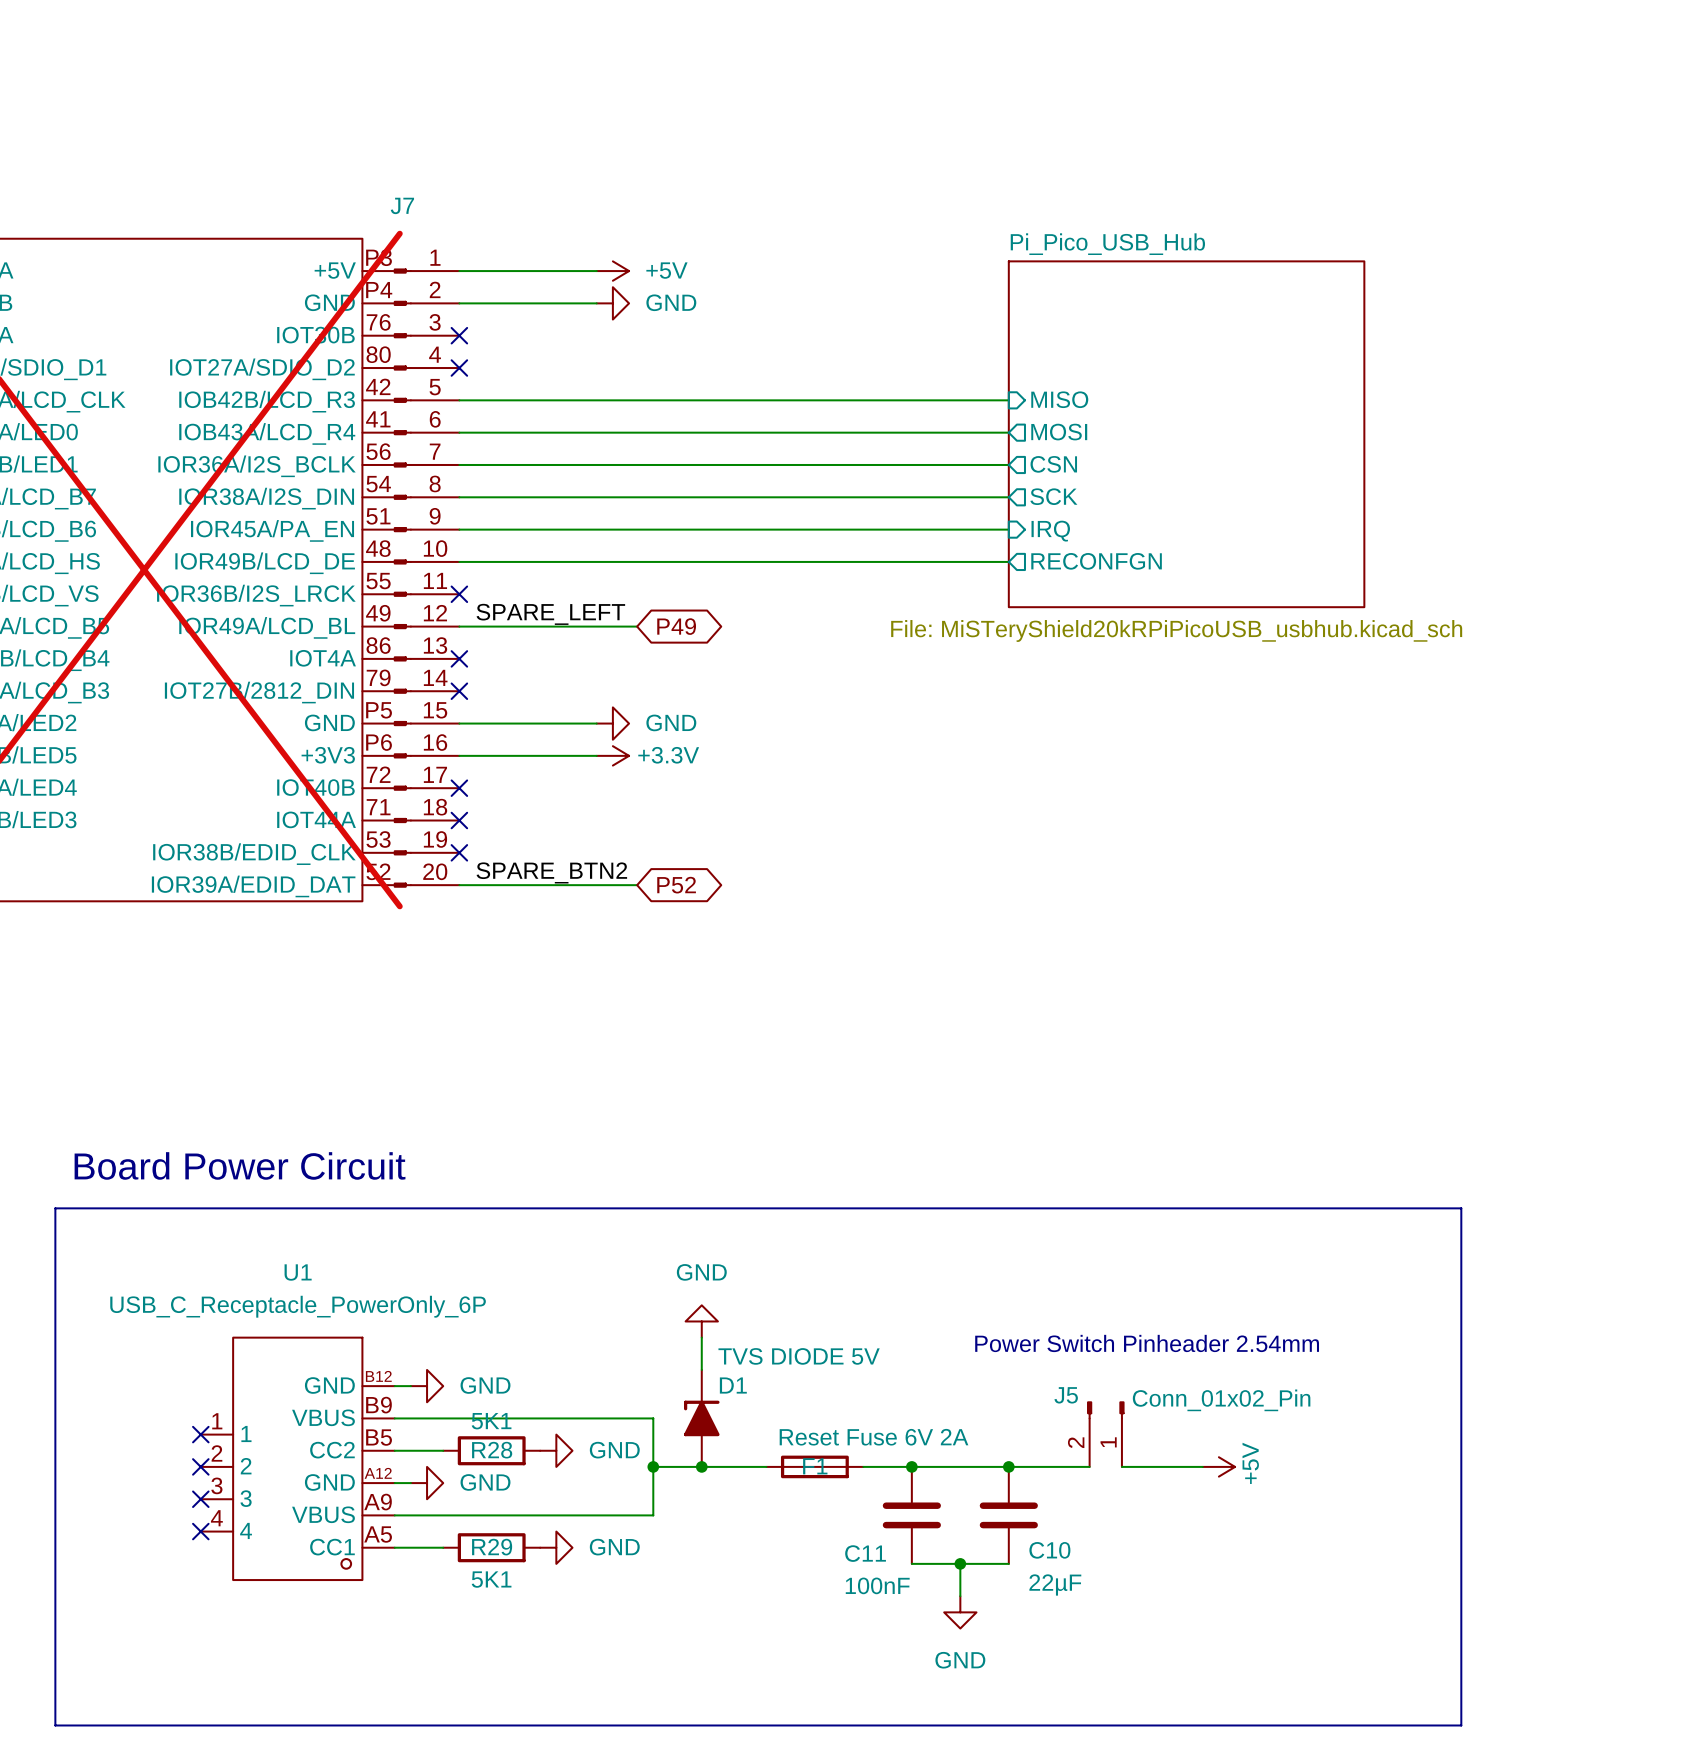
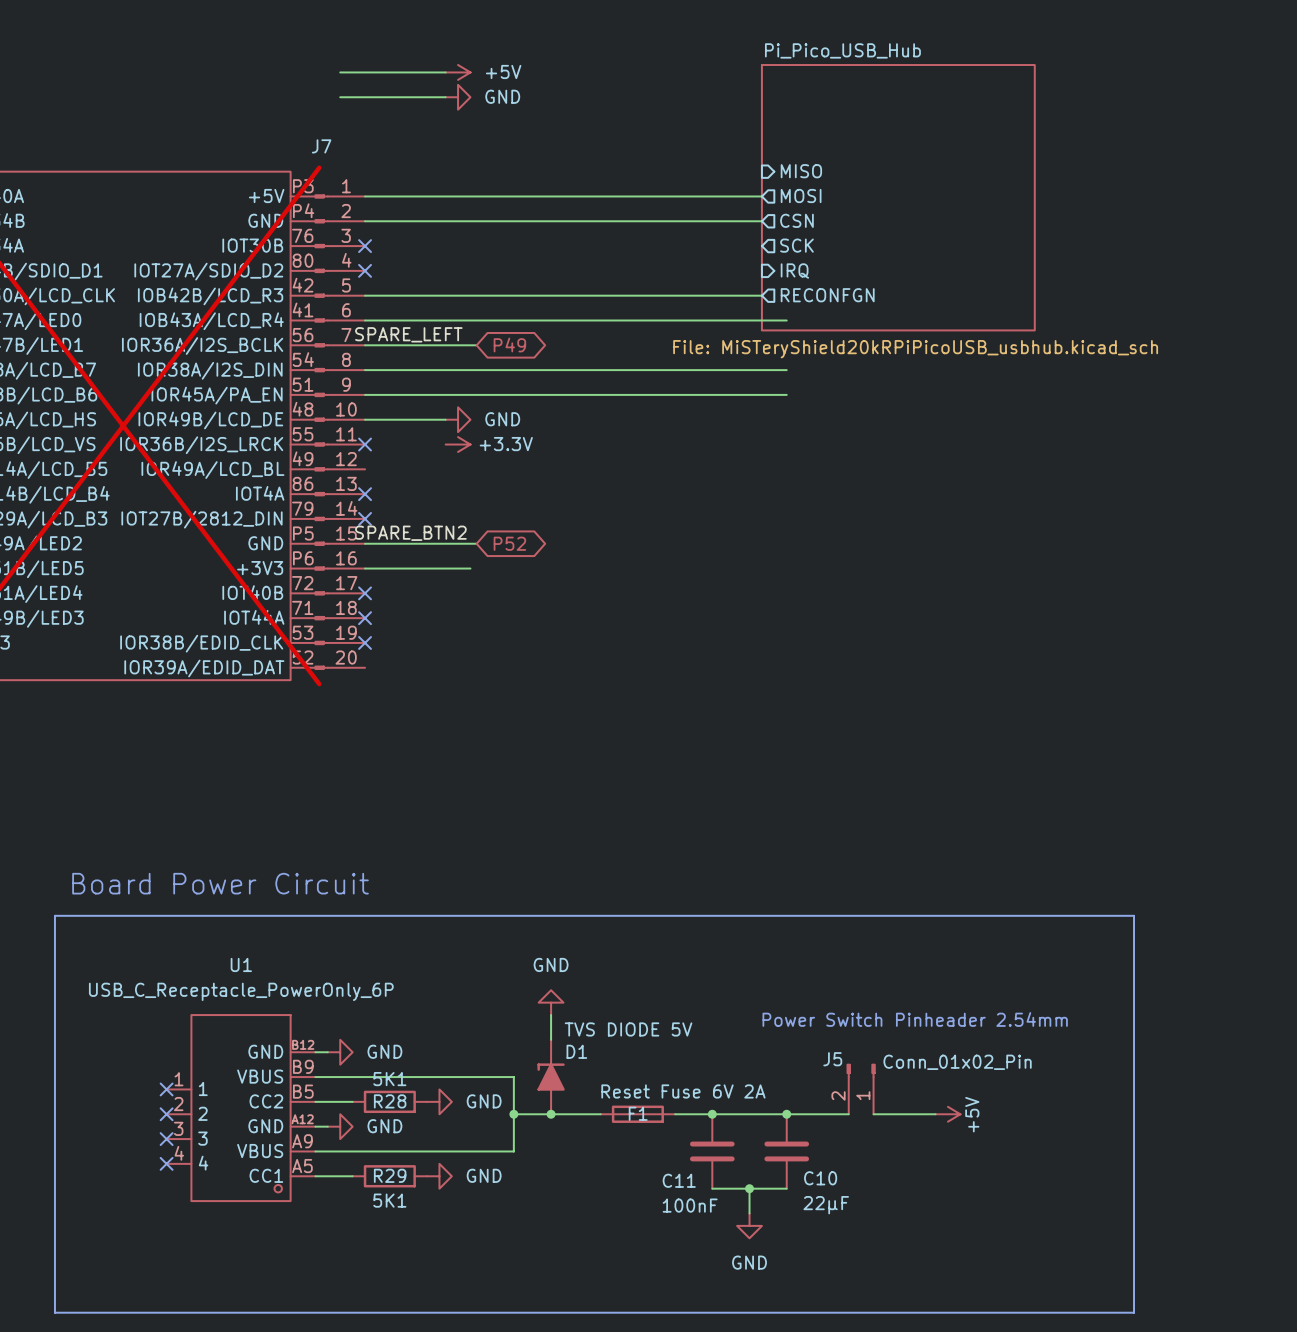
wire: none -> (340, 72) (445, 72)
wire: none -> (340, 97) (445, 97)
power symbol: none -> GND (458, 97)
wire: none -> (470, 196) (761, 196)
power symbol position: +5V (612, 271) -> +5V (458, 72)
wire: none -> (470, 221) (761, 221)
power symbol: GND (612, 303) -> none
sheet pin position: MISO (1059, 399) -> MISO (801, 171)
wire: (976, 400) (1008, 400) -> none
sheet pin position: MOSI (1059, 432) -> MOSI (801, 196)
sheet Pi_Pico_USB_Hub position: (1186, 434) -> (898, 197)
wire: (604, 464) (1008, 464) -> none
sheet pin position: CSN (1053, 464) -> CSN (796, 220)
sheet pin position: SCK (1053, 496) -> SCK (796, 245)
sheet pin position: IRQ (1050, 531) -> IRQ (794, 271)
wire: (564, 561) (1008, 561) -> none
power symbol: none -> GND (458, 419)
sheet pin position: RECONFGN (1096, 561) -> RECONFGN (827, 295)
label position: SPARE_LEFT (550, 614) -> SPARE_LEFT (408, 334)
wire: (459, 626) (637, 626) -> none
global label position: P49 (676, 626) -> P49 (509, 345)
power symbol: GND (612, 723) -> none
power symbol position: +3.3V (612, 755) -> +3.3V (458, 444)
label position: SPARE_BTN2 (551, 872) -> SPARE_BTN2 (410, 533)
wire: (459, 885) (637, 885) -> none
global label position: P52 (676, 885) -> P52 (509, 543)

